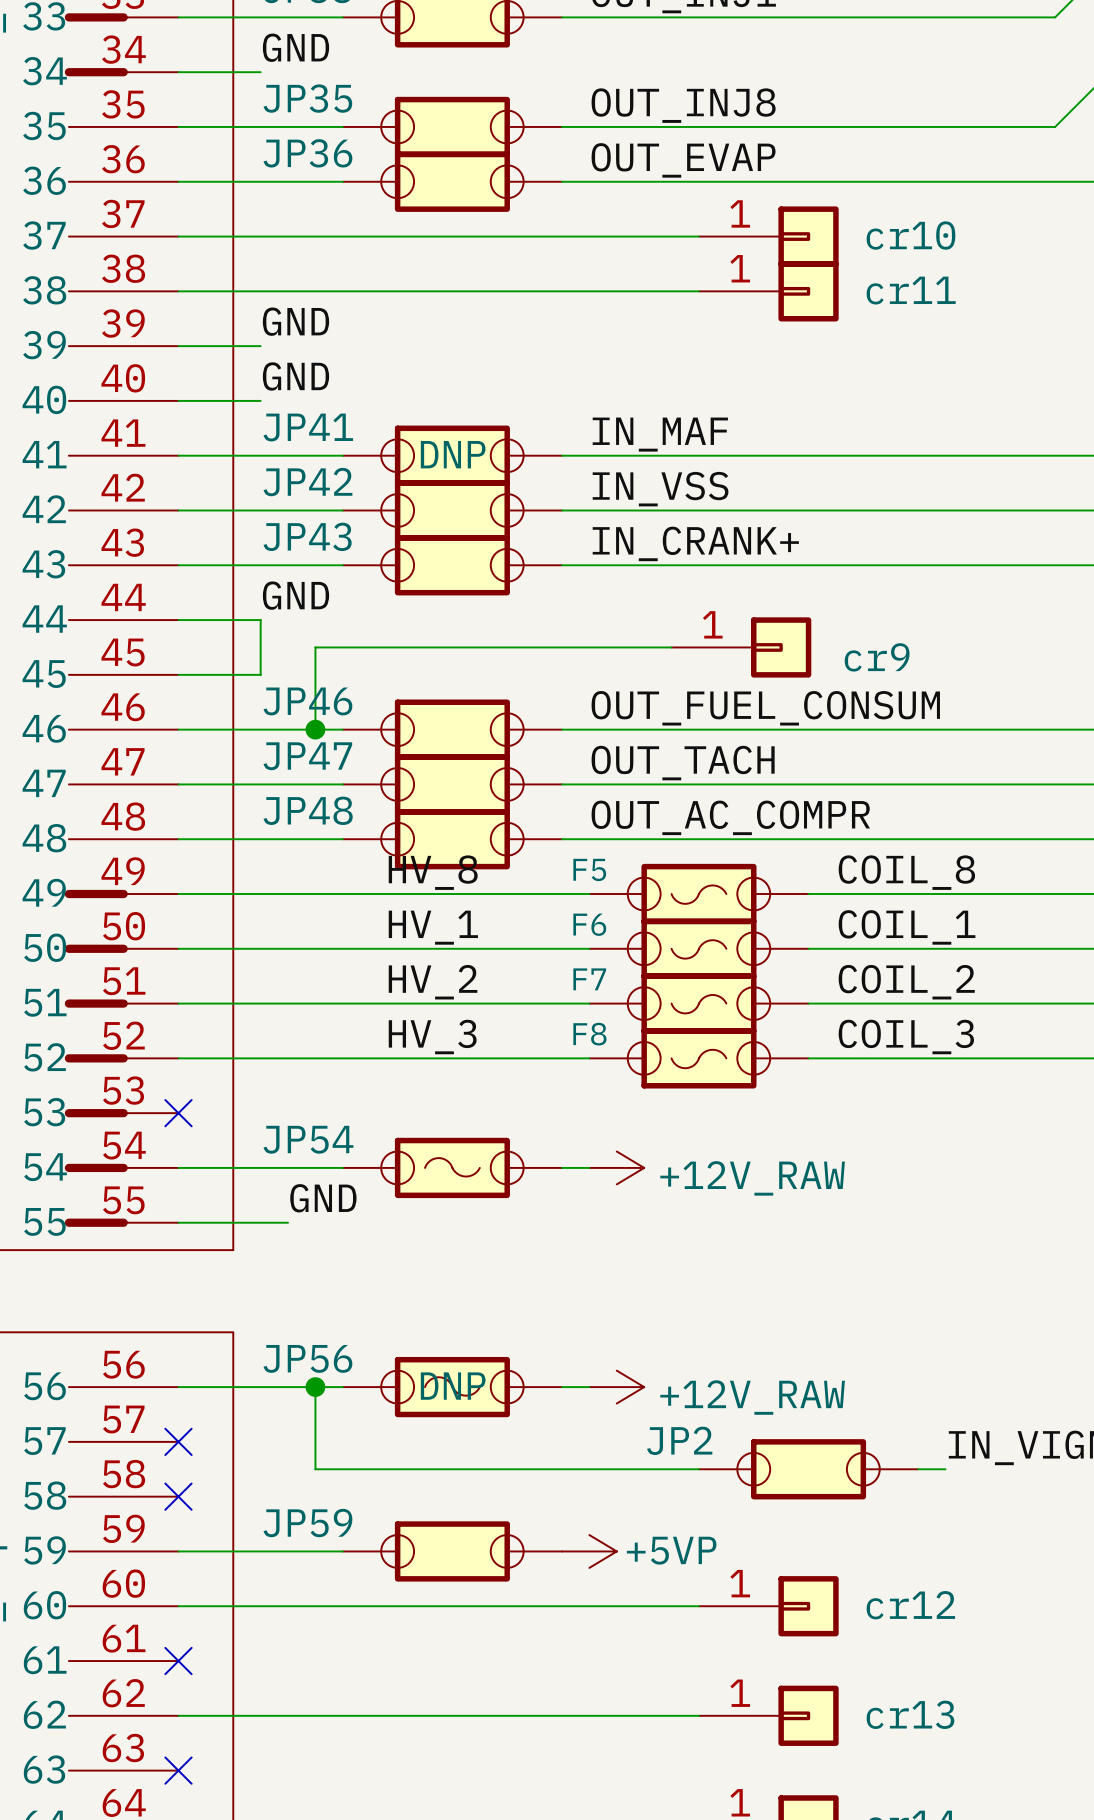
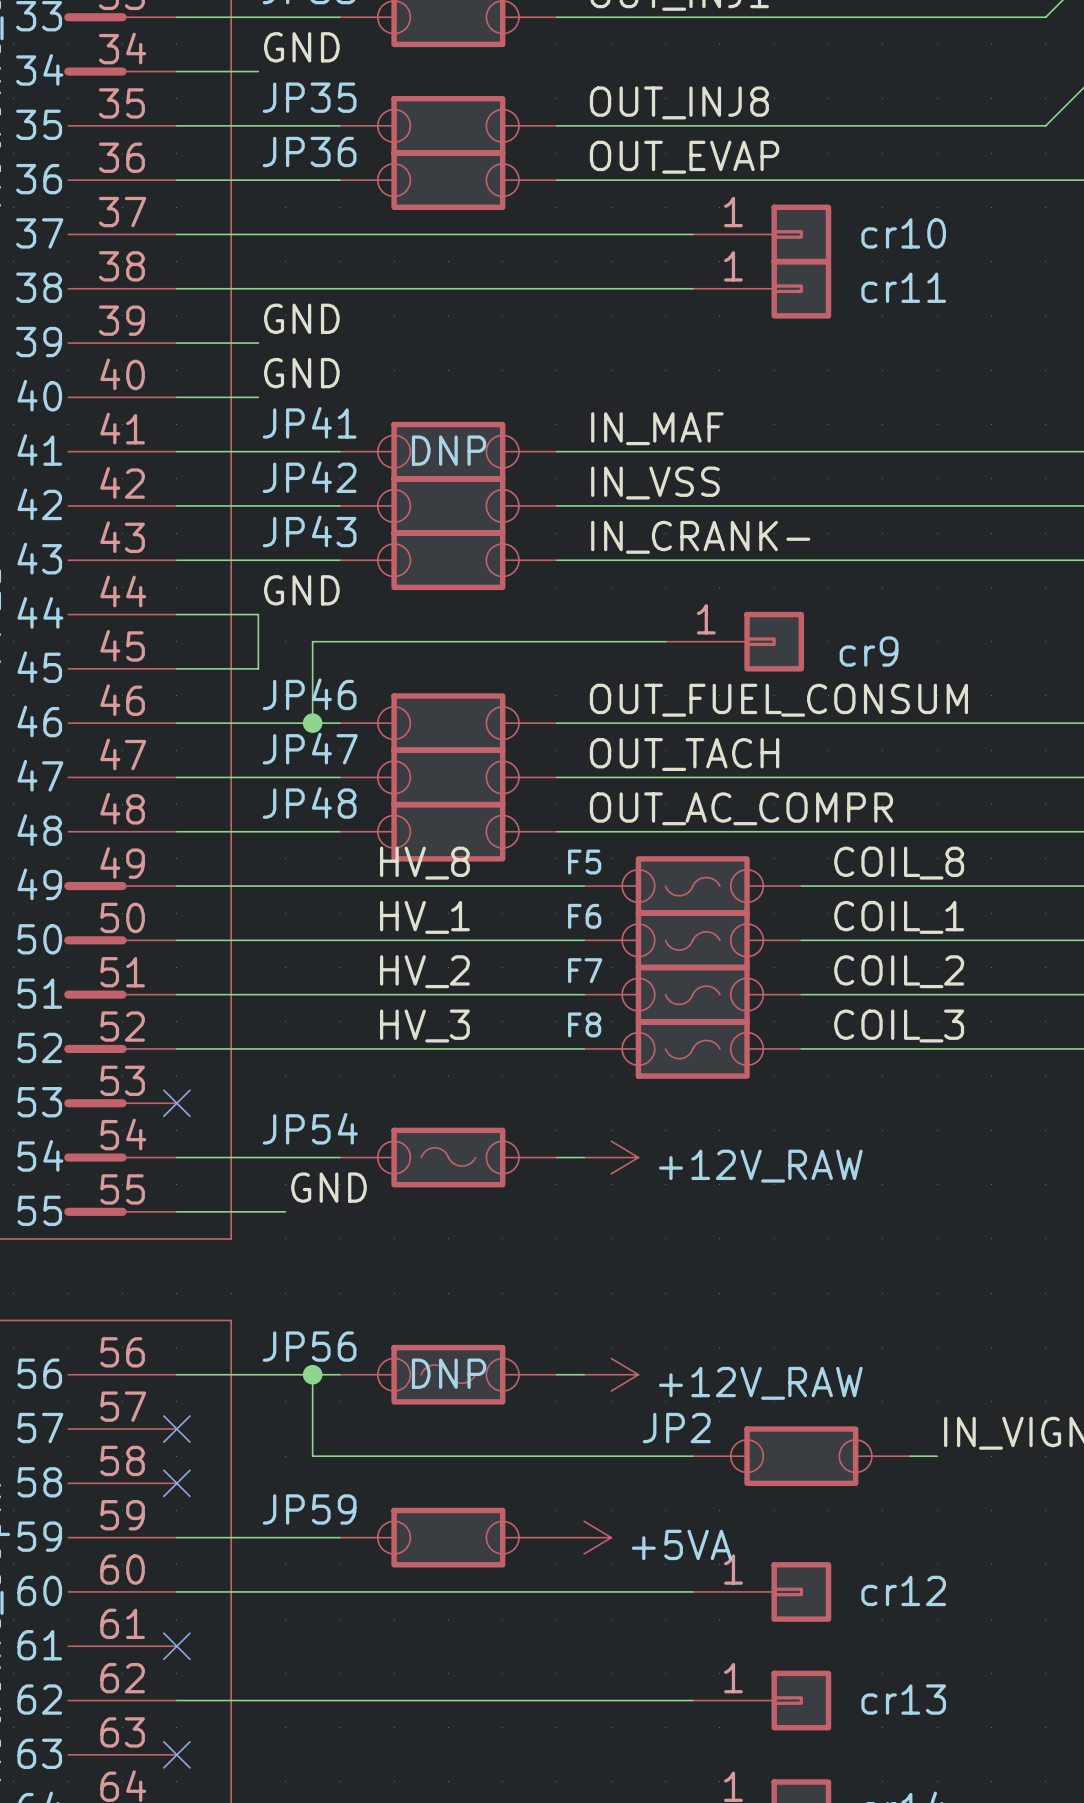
label: IN_CRANK+ (695, 543) -> IN_CRANK- (700, 537)
power symbol: +5VP (589, 1551) -> +5VA (584, 1537)

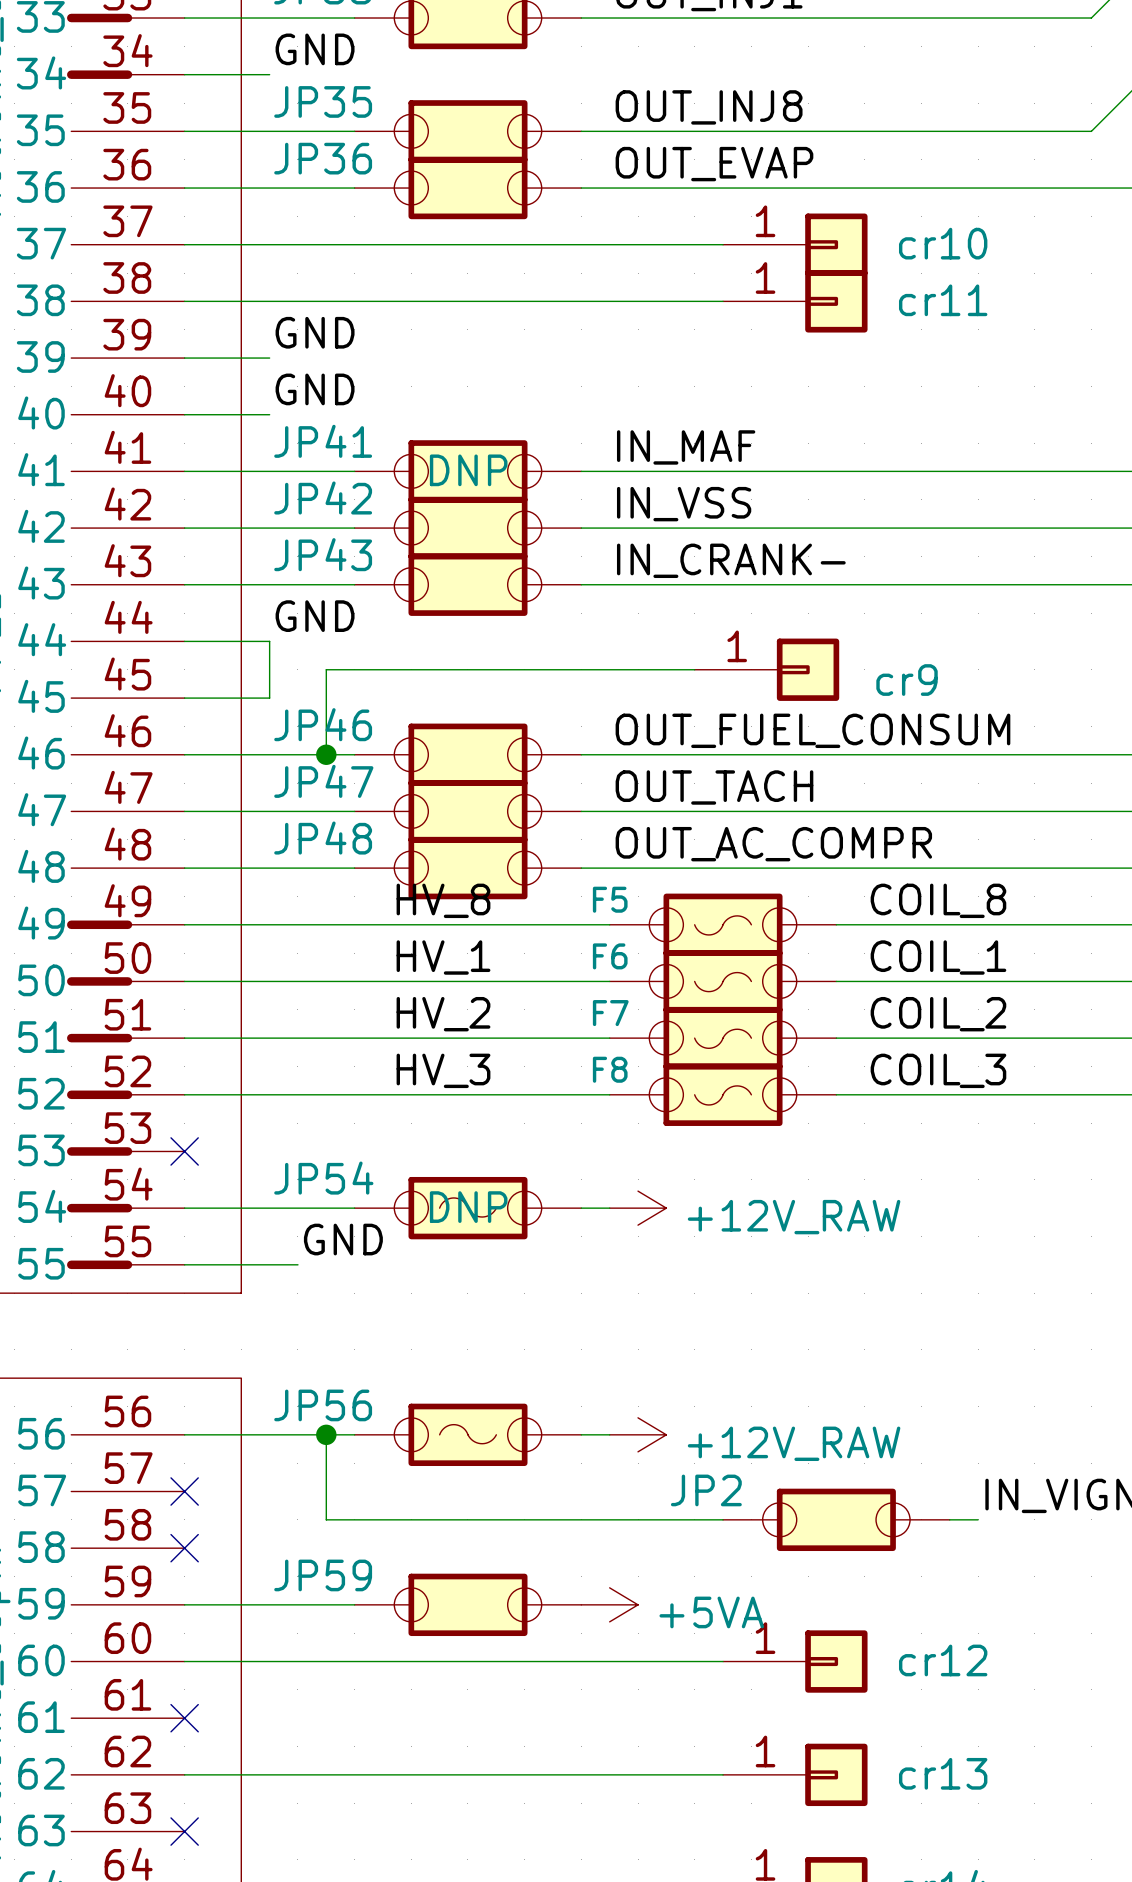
JP54 text: none -> DNP (468, 1207)
JP56 text: DNP (449, 1373) -> none

